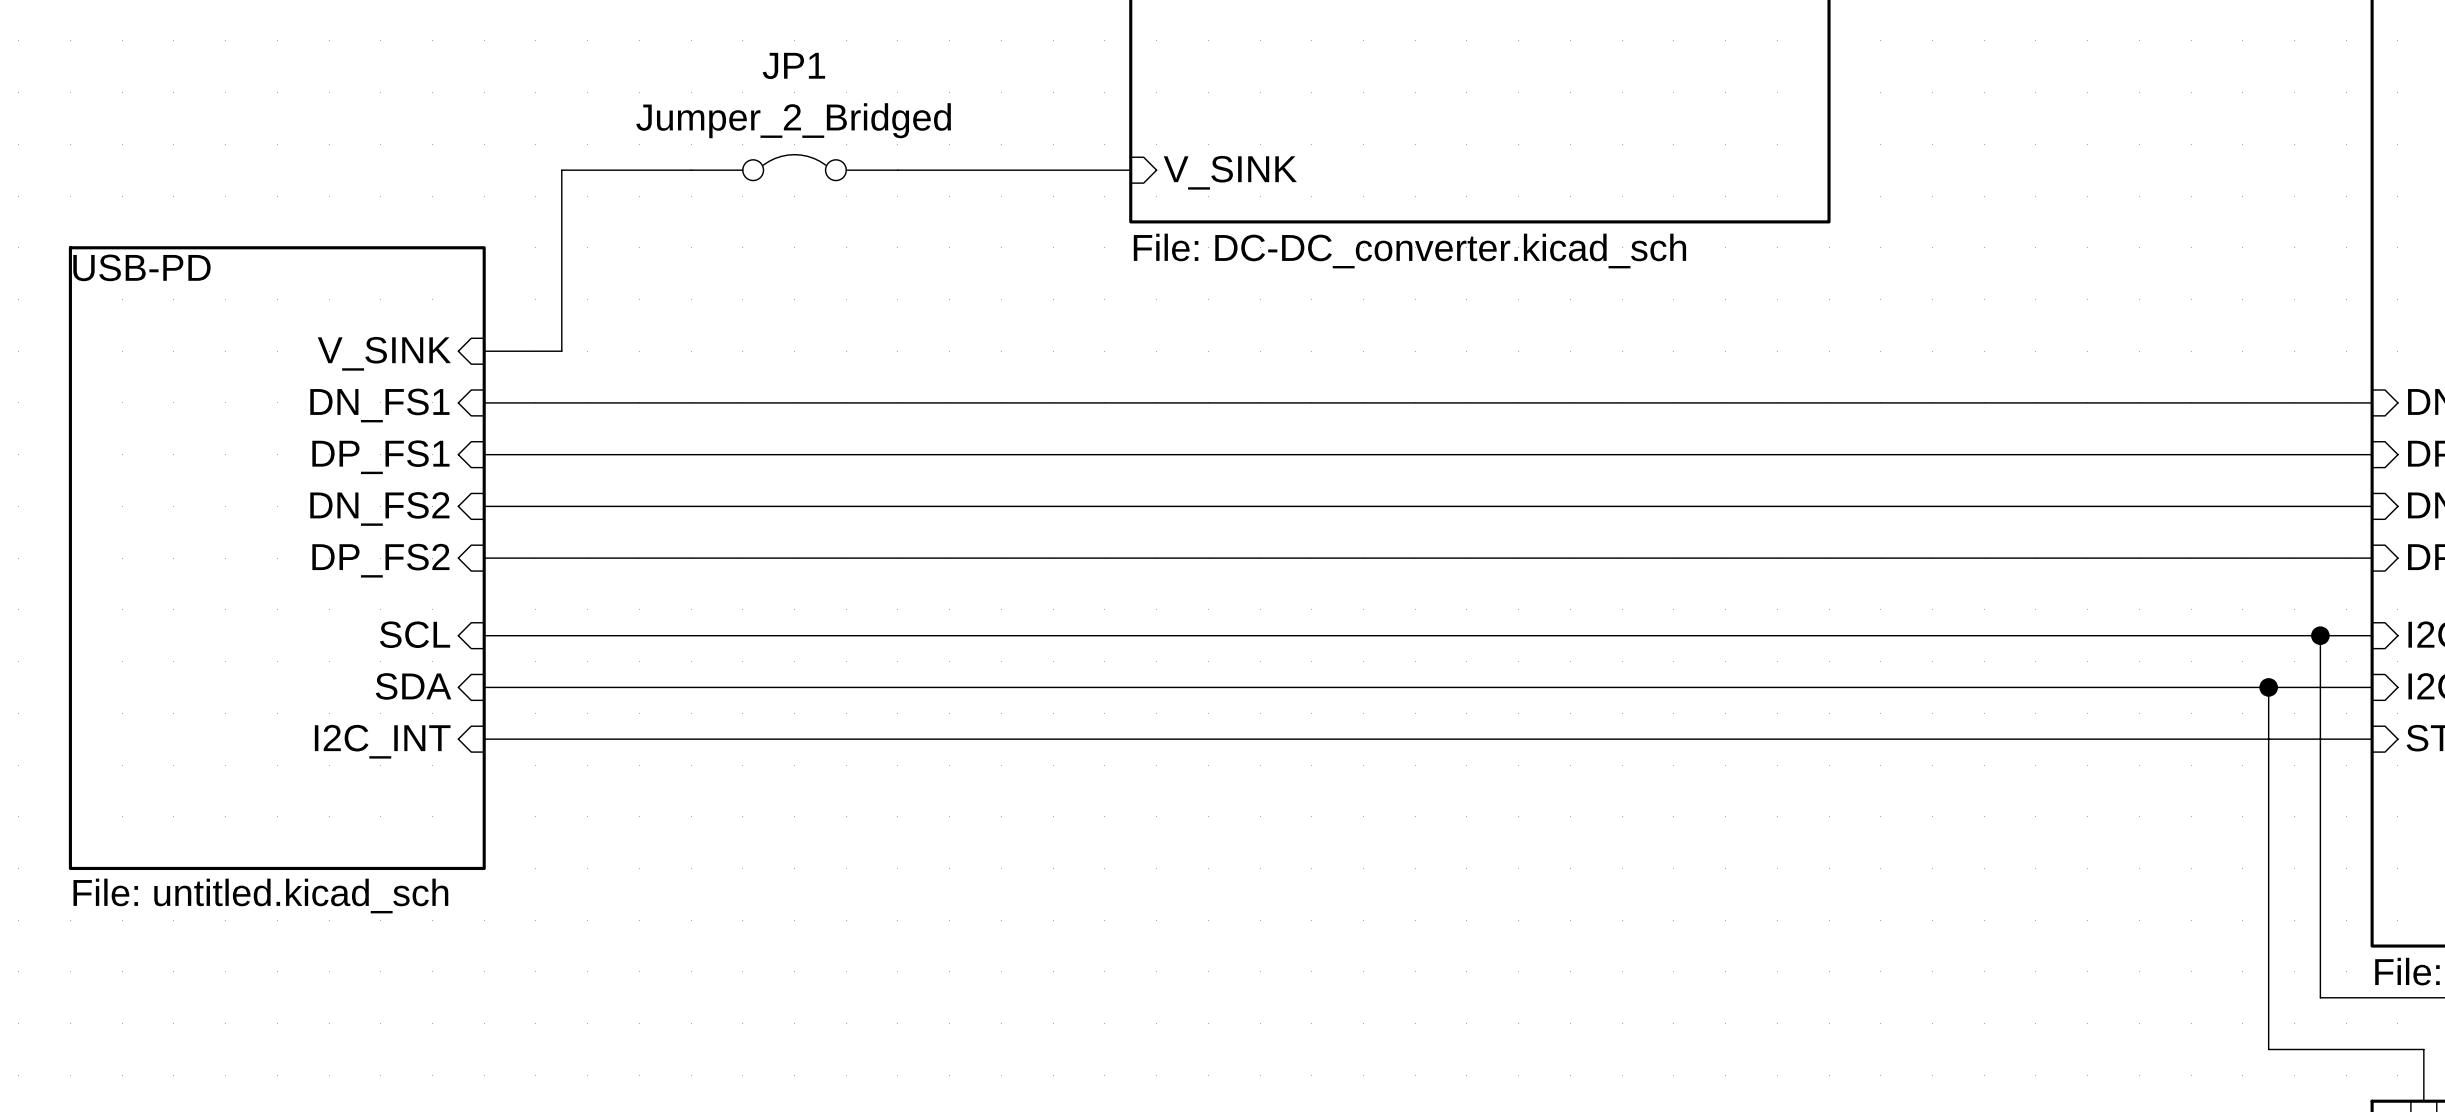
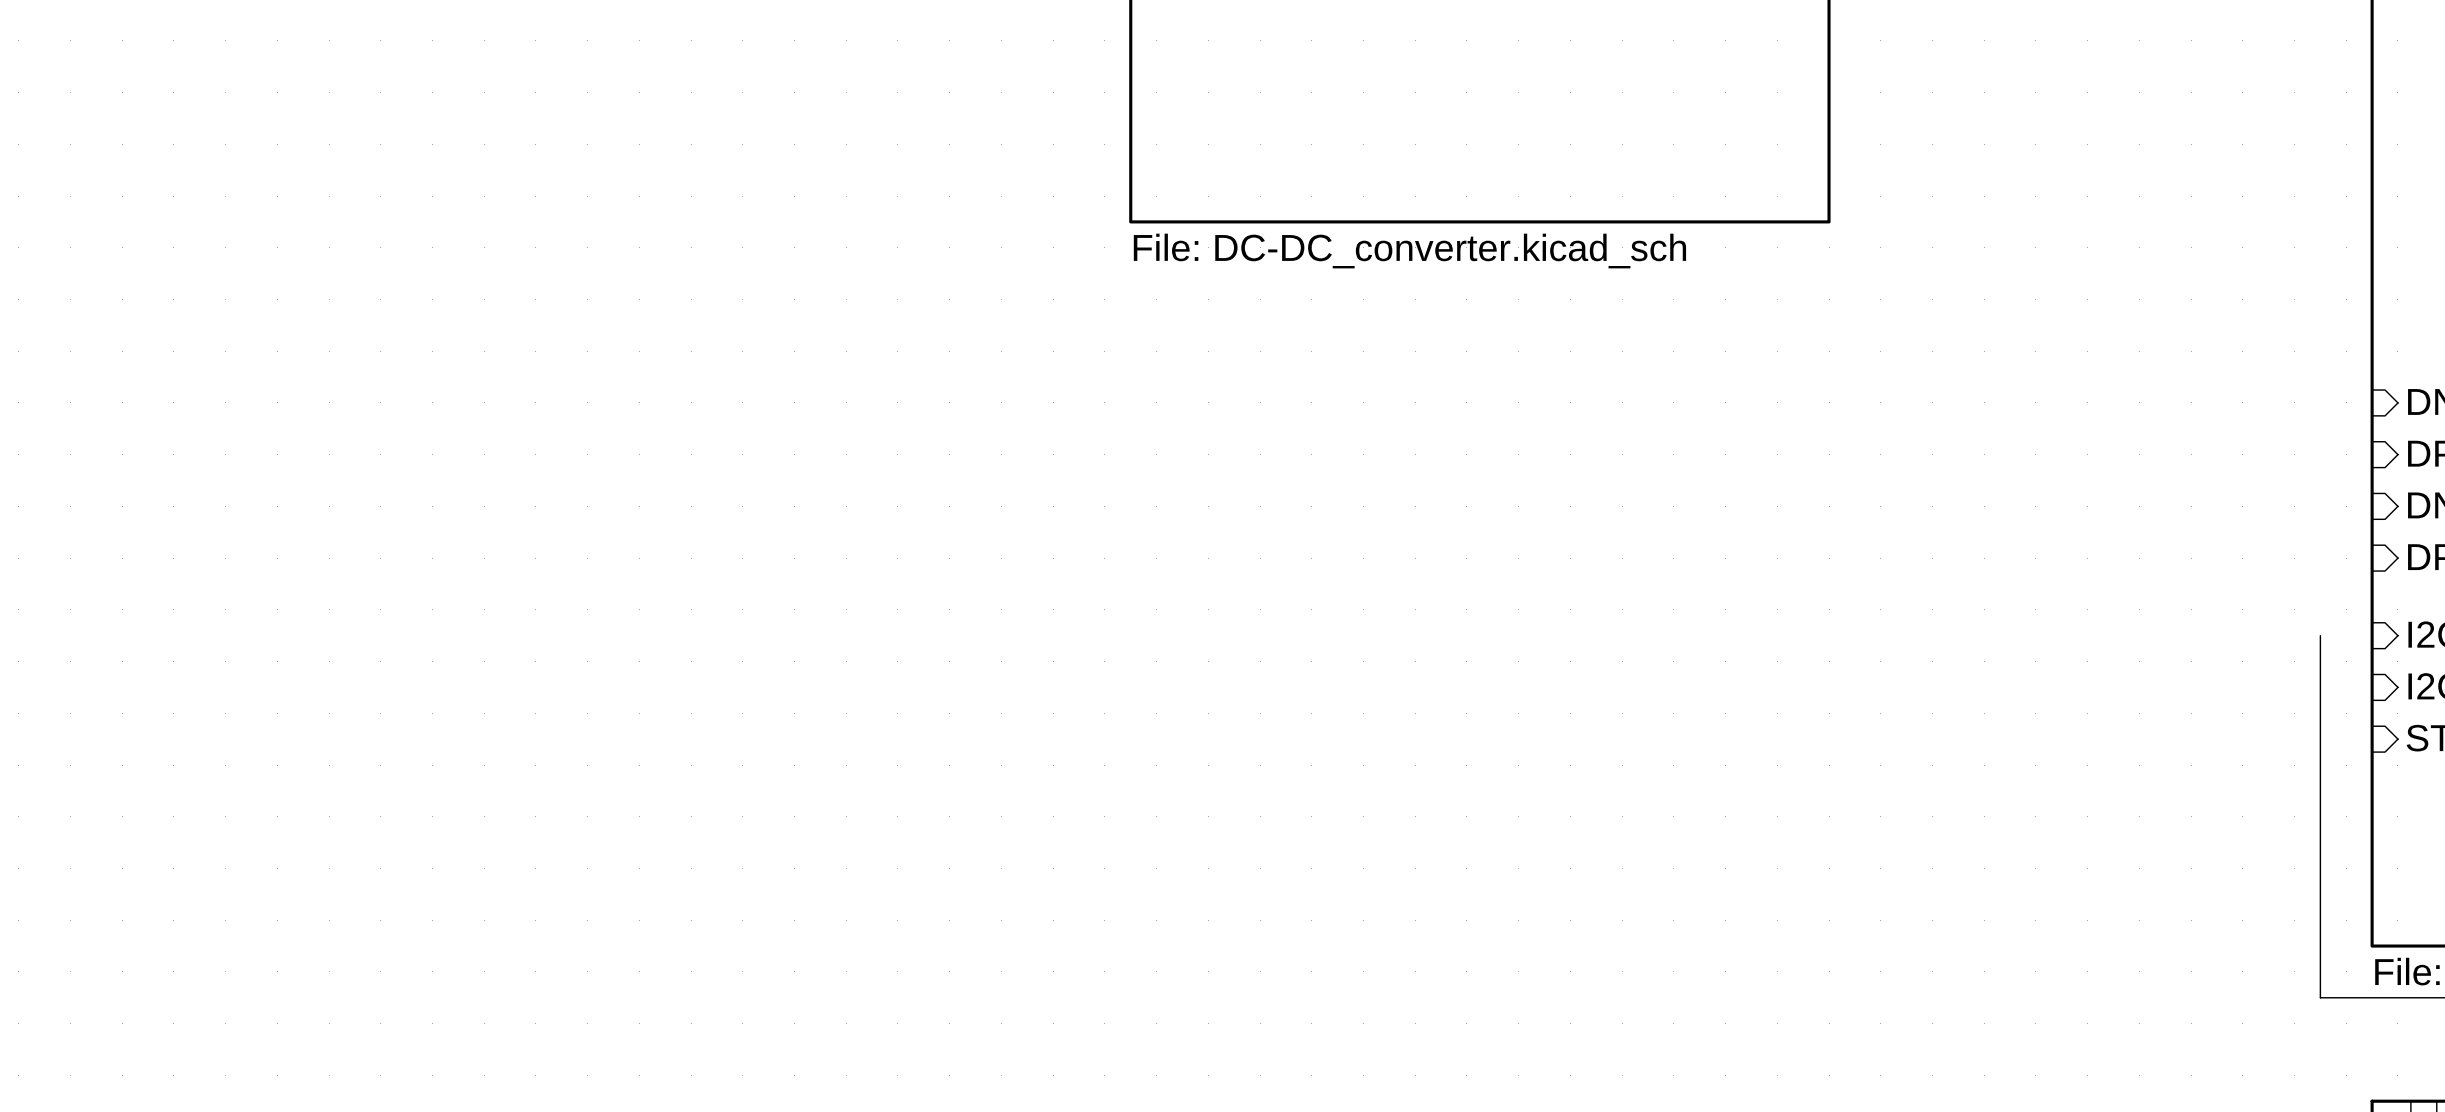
JP1: Jumper_2_Bridged (794, 167) -> none
wire: (691, 170) (561, 170) (561, 351) (484, 351) -> none
wire: (897, 170) (1130, 170) -> none
sheet pin: V_SINK (1230, 172) -> none
sheet pin: V_SINK (384, 353) -> none
wire: (484, 402) (2372, 402) -> none
sheet pin: DN_FS1 (379, 405) -> none
wire: (484, 454) (2372, 454) -> none
sheet pin: DP_FS1 (380, 457) -> none
wire: (484, 506) (2372, 506) -> none
sheet pin: DN_FS2 (379, 508) -> none
sheet USB-PD: File: untitled.kicad_sch (277, 558) -> none
wire: (484, 558) (2372, 558) -> none
sheet pin: DP_FS2 (380, 560) -> none
sheet pin: SCL (415, 634) -> none
wire: (484, 635) (2372, 635) -> none
junction: (2320, 635) -> none
sheet pin: SDA (413, 686) -> none
wire: (484, 687) (2372, 687) -> none
wire: (2268, 687) (2268, 1049) (2423, 1049) (2423, 1101) -> none
junction: (2268, 687) -> none
wire: (484, 739) (2372, 739) -> none
sheet pin: I2C_INT (382, 741) -> none

